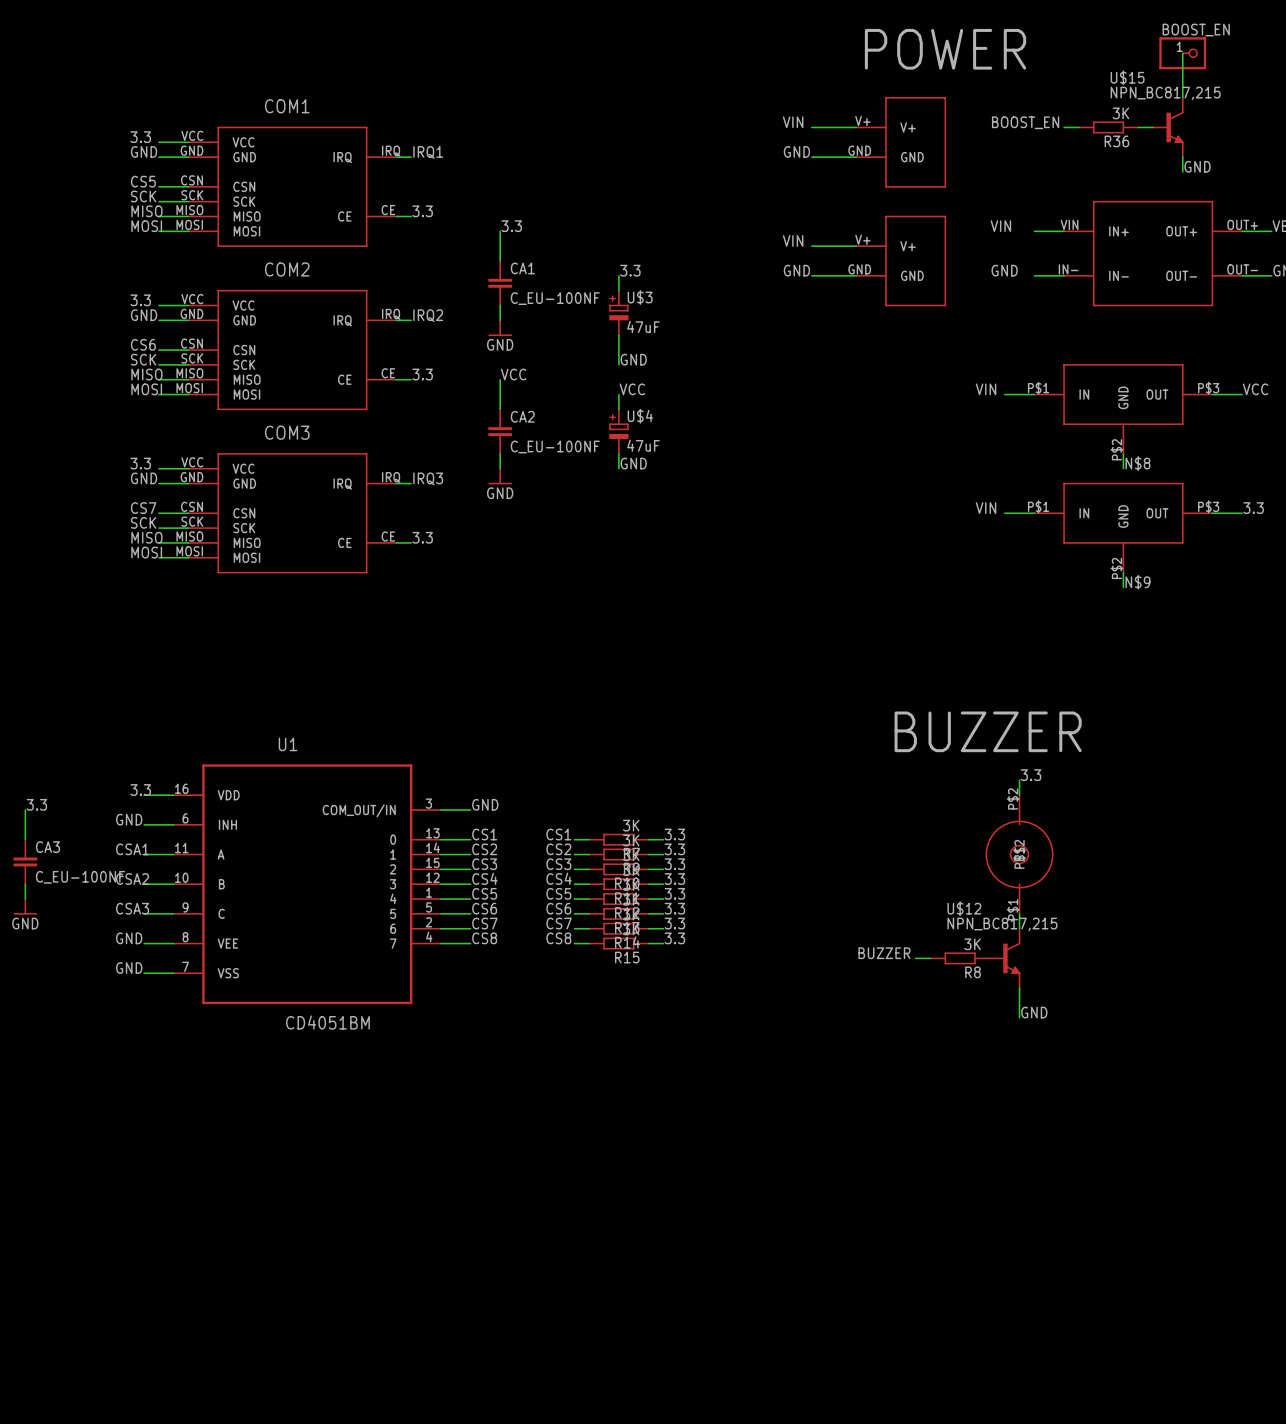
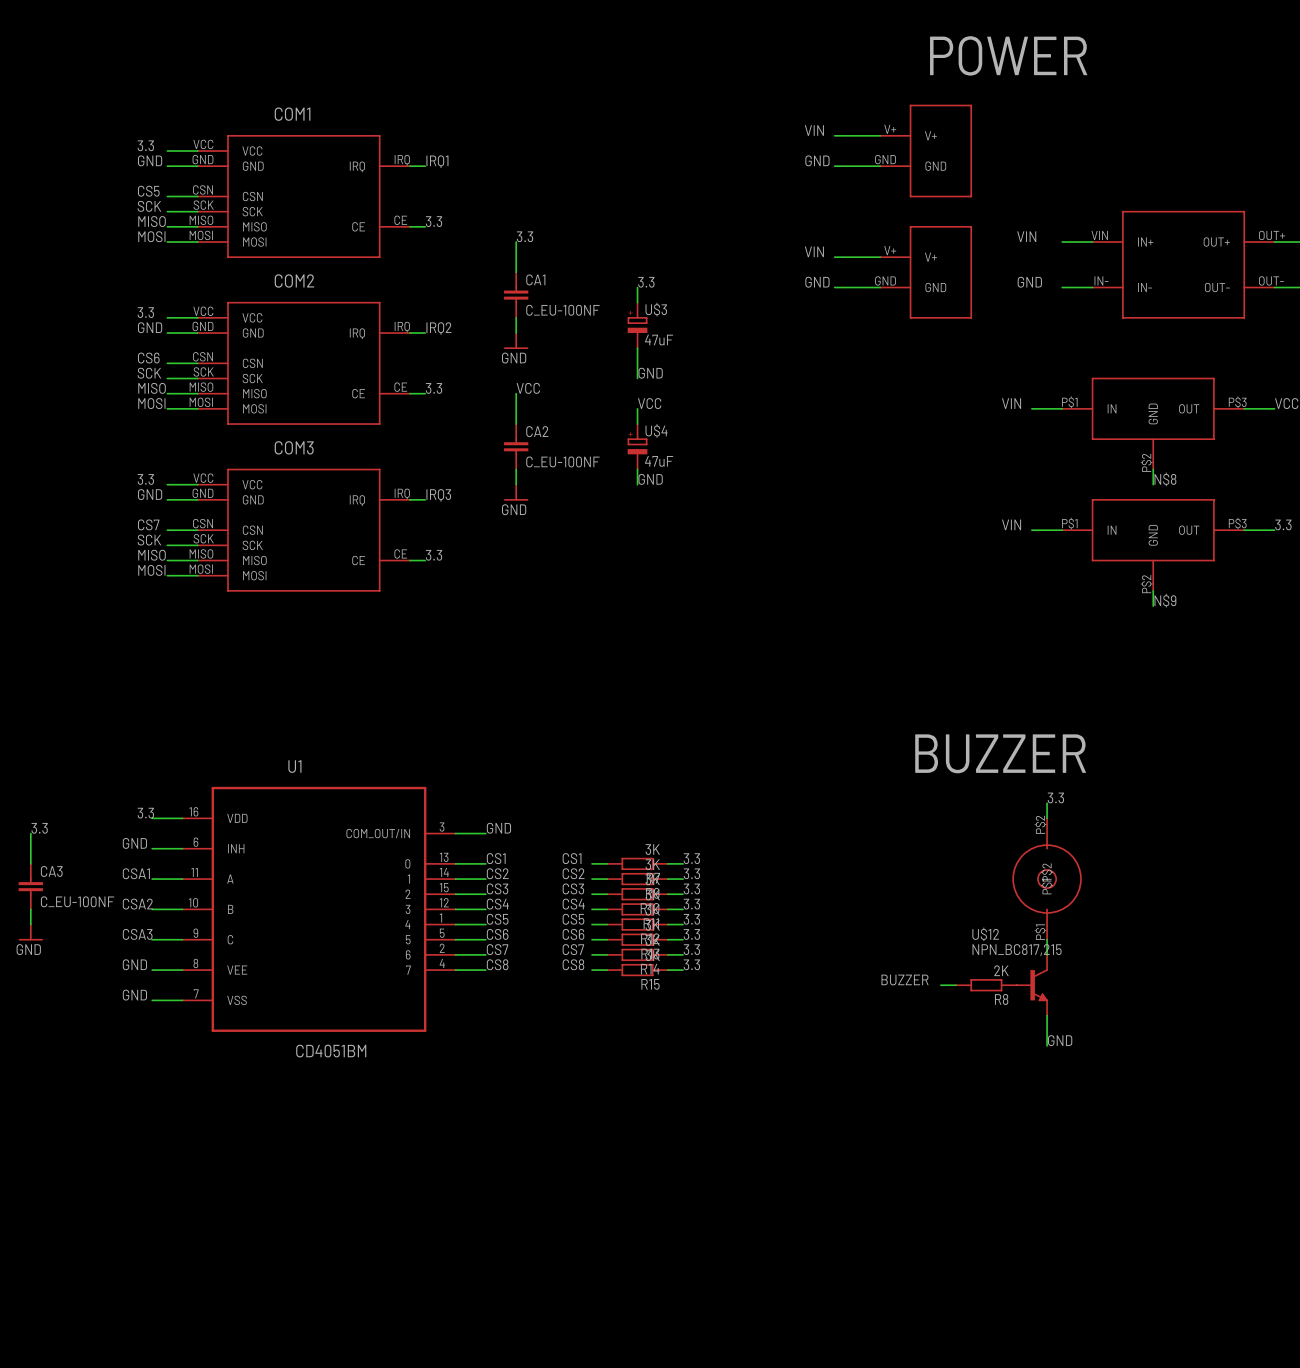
text position: POWER (945, 49) -> POWER (1008, 55)
wire: (1182, 53) (1182, 97) -> none
BOOST_EN: (1182, 53) -> none
label: BOOST_EN (1025, 122) -> none
wire: (1064, 127) (1078, 127) -> none
R36: 3K (1108, 127) -> none
wire: (1138, 127) (1153, 127) -> none
U$15: NPN_BC817,215 (1168, 127) -> none
wire: (1182, 157) (1182, 171) -> none
label: GND (1197, 166) -> none
R8 value: 3K (972, 944) -> 2K (1001, 970)

